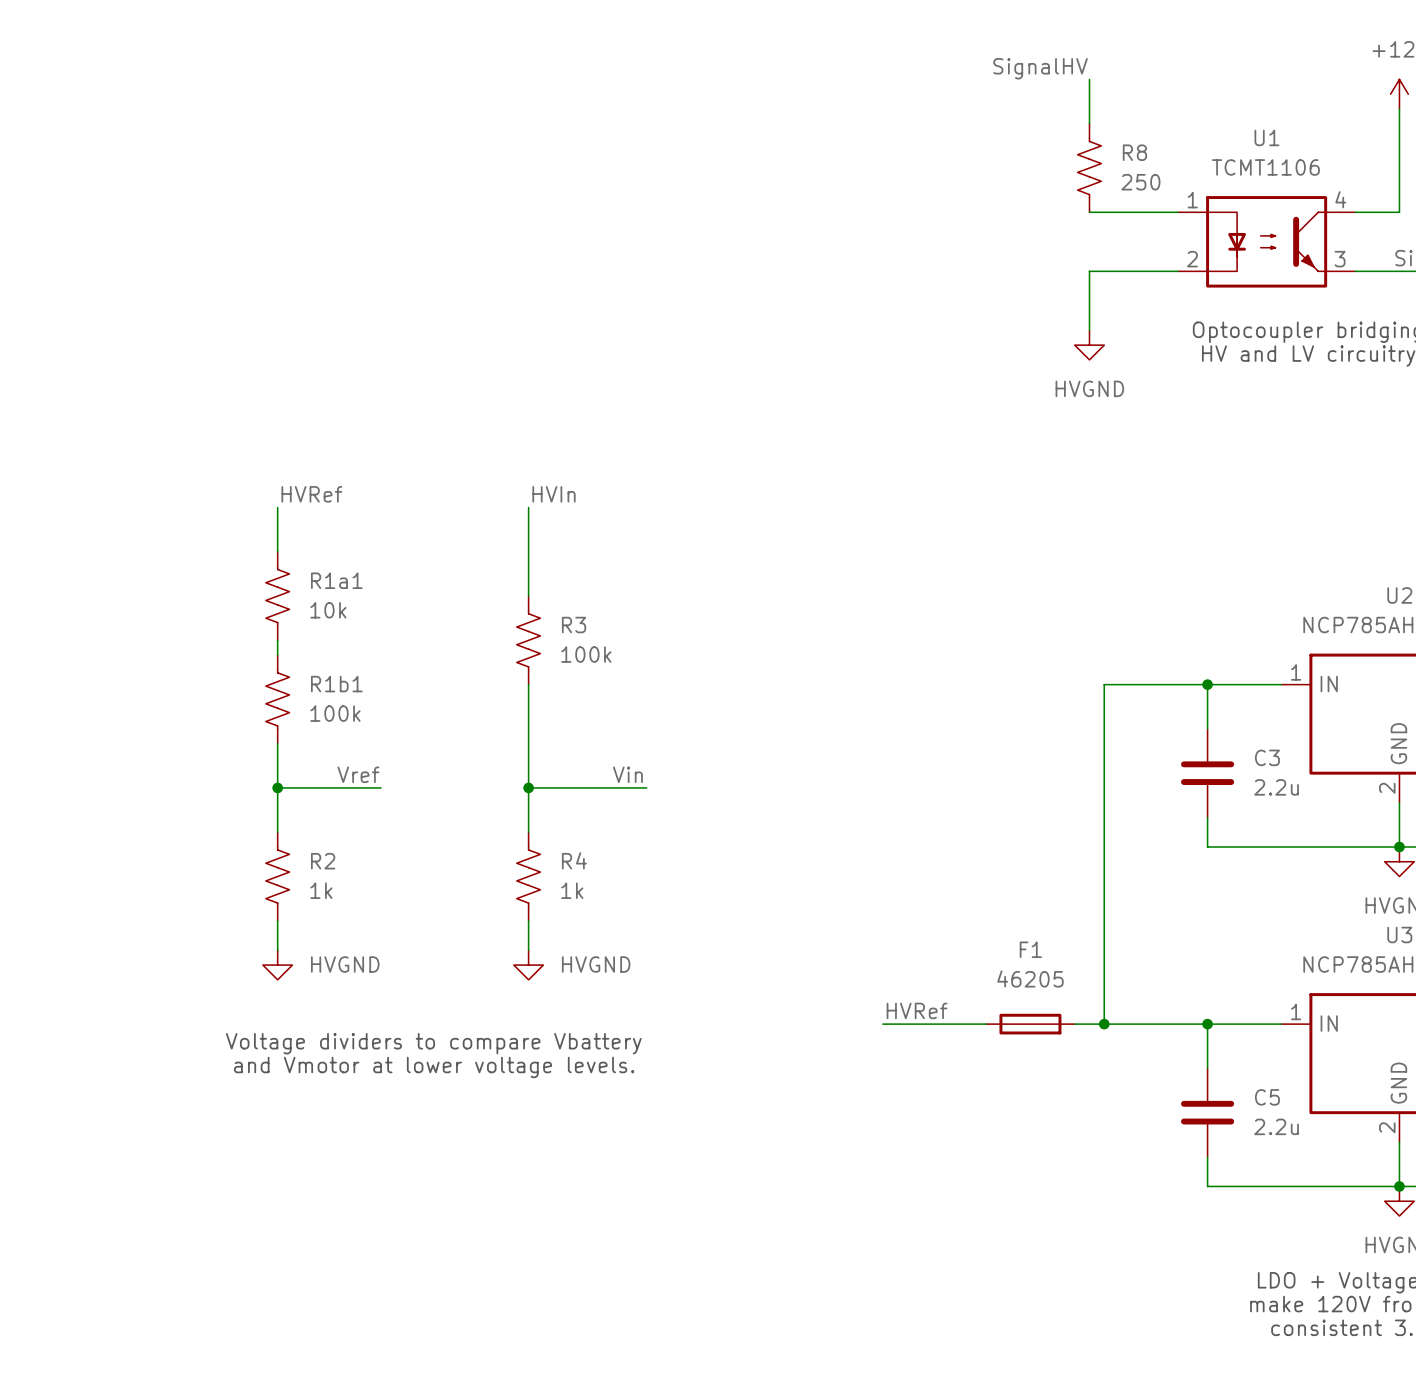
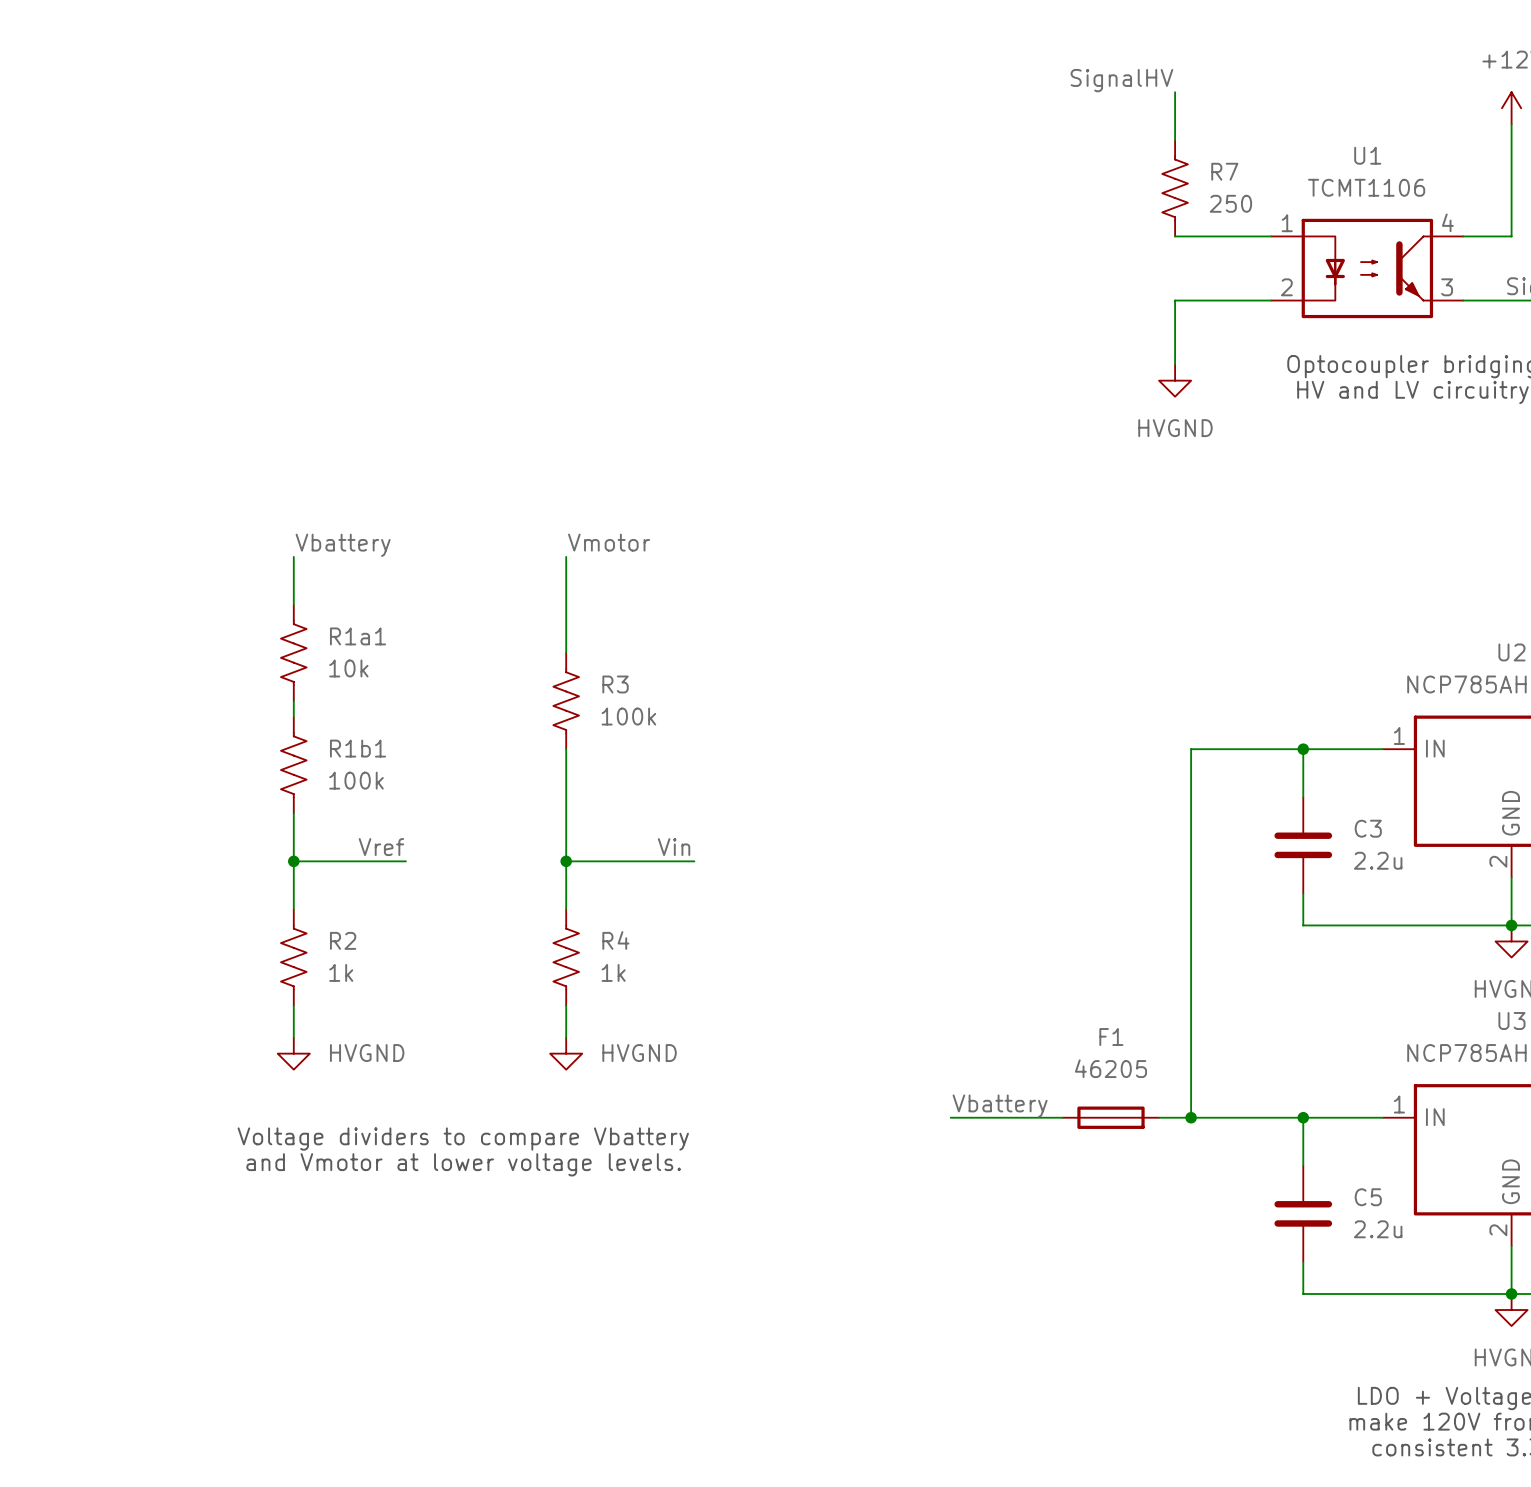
R8 name: R8 (1134, 152) -> R7 (1224, 171)
label: HVRef (311, 494) -> Vbattery (343, 545)
label: HVIn (554, 494) -> Vmotor (609, 542)
label: HVRef (917, 1010) -> Vbattery (1000, 1106)

